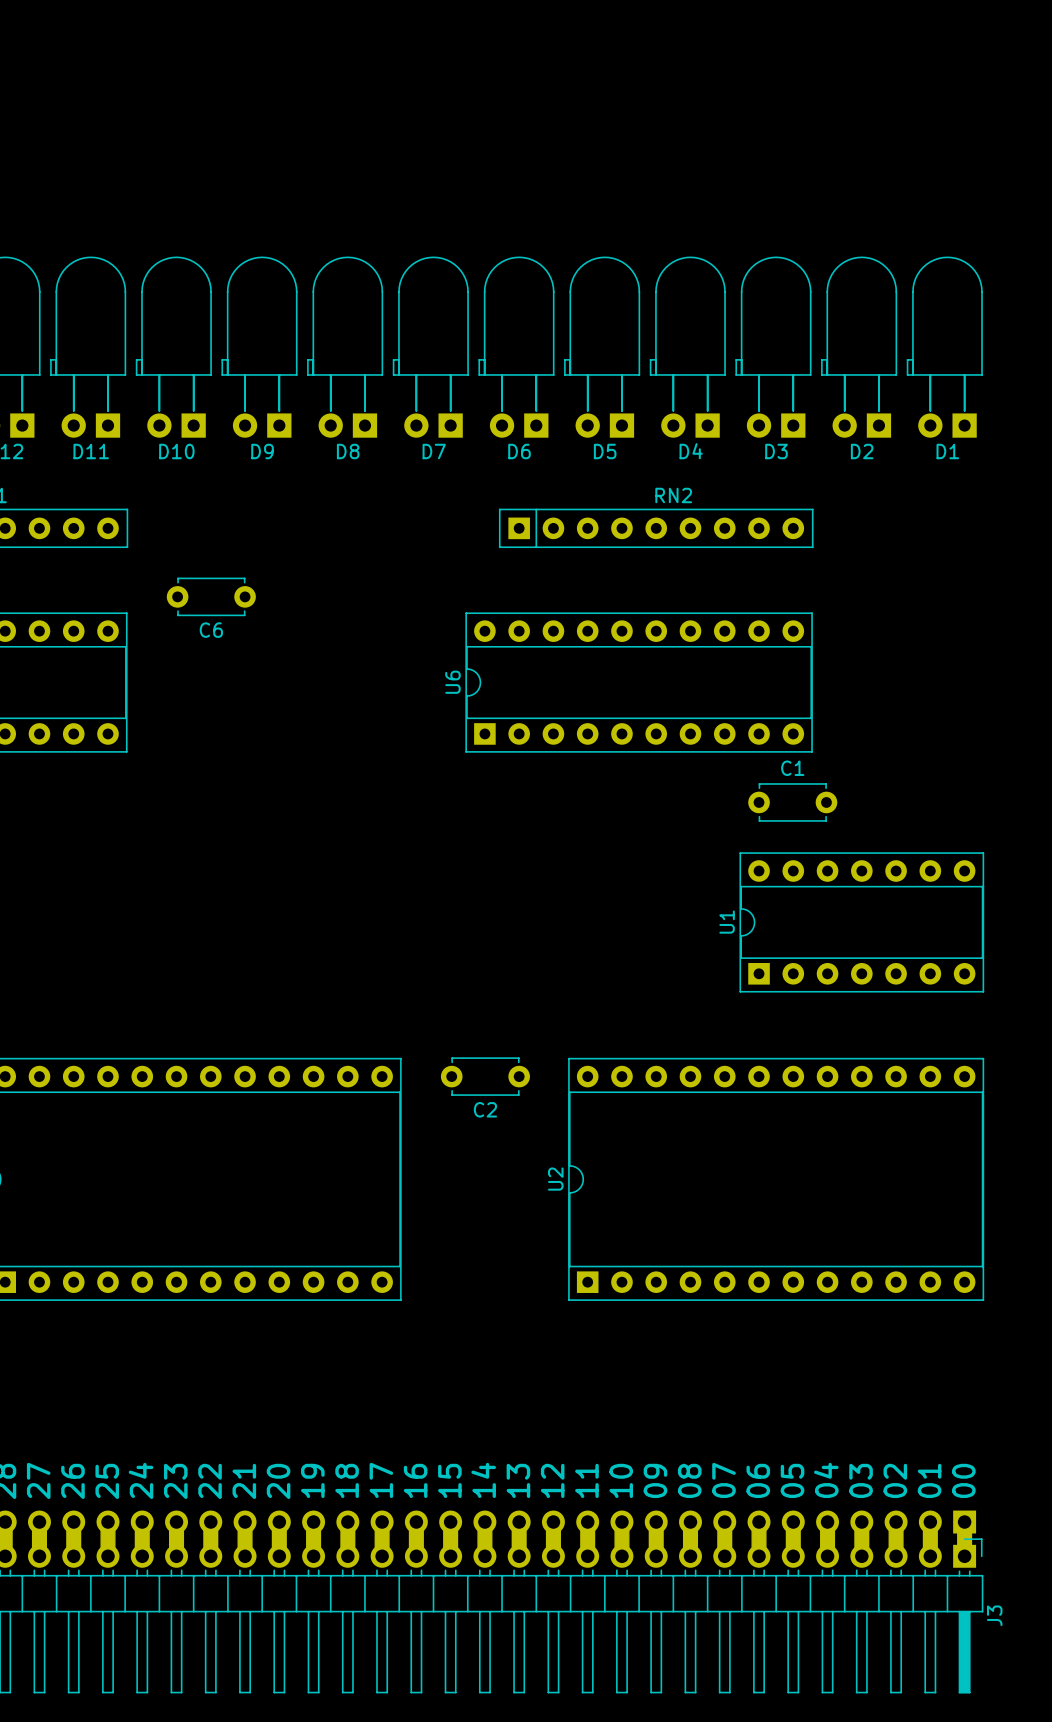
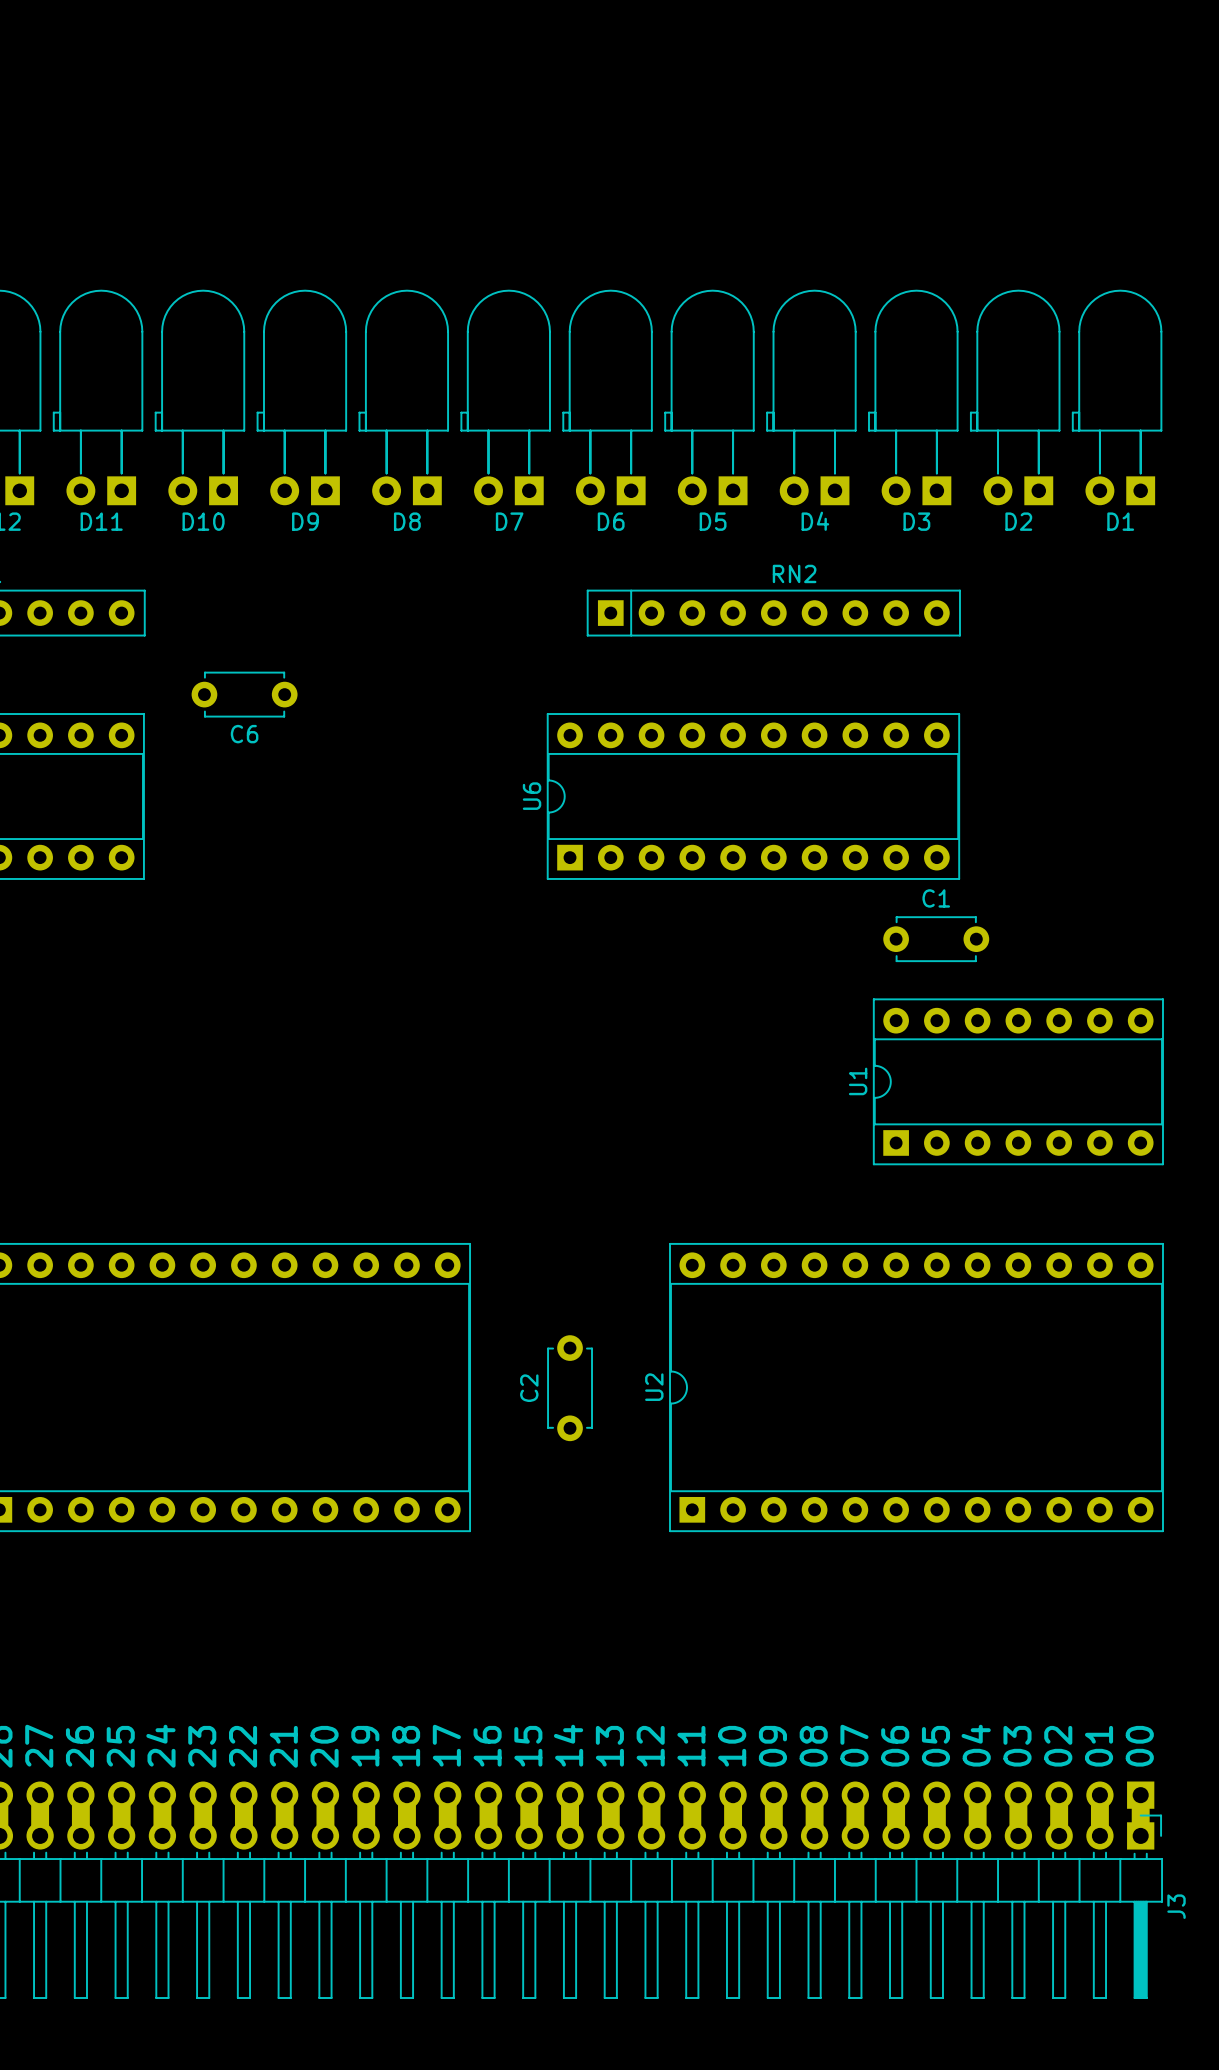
C2 rotation: 0° (485, 1076) -> 90° clockwise (570, 1388)
C2 position: (485, 1076) -> (570, 1388)

